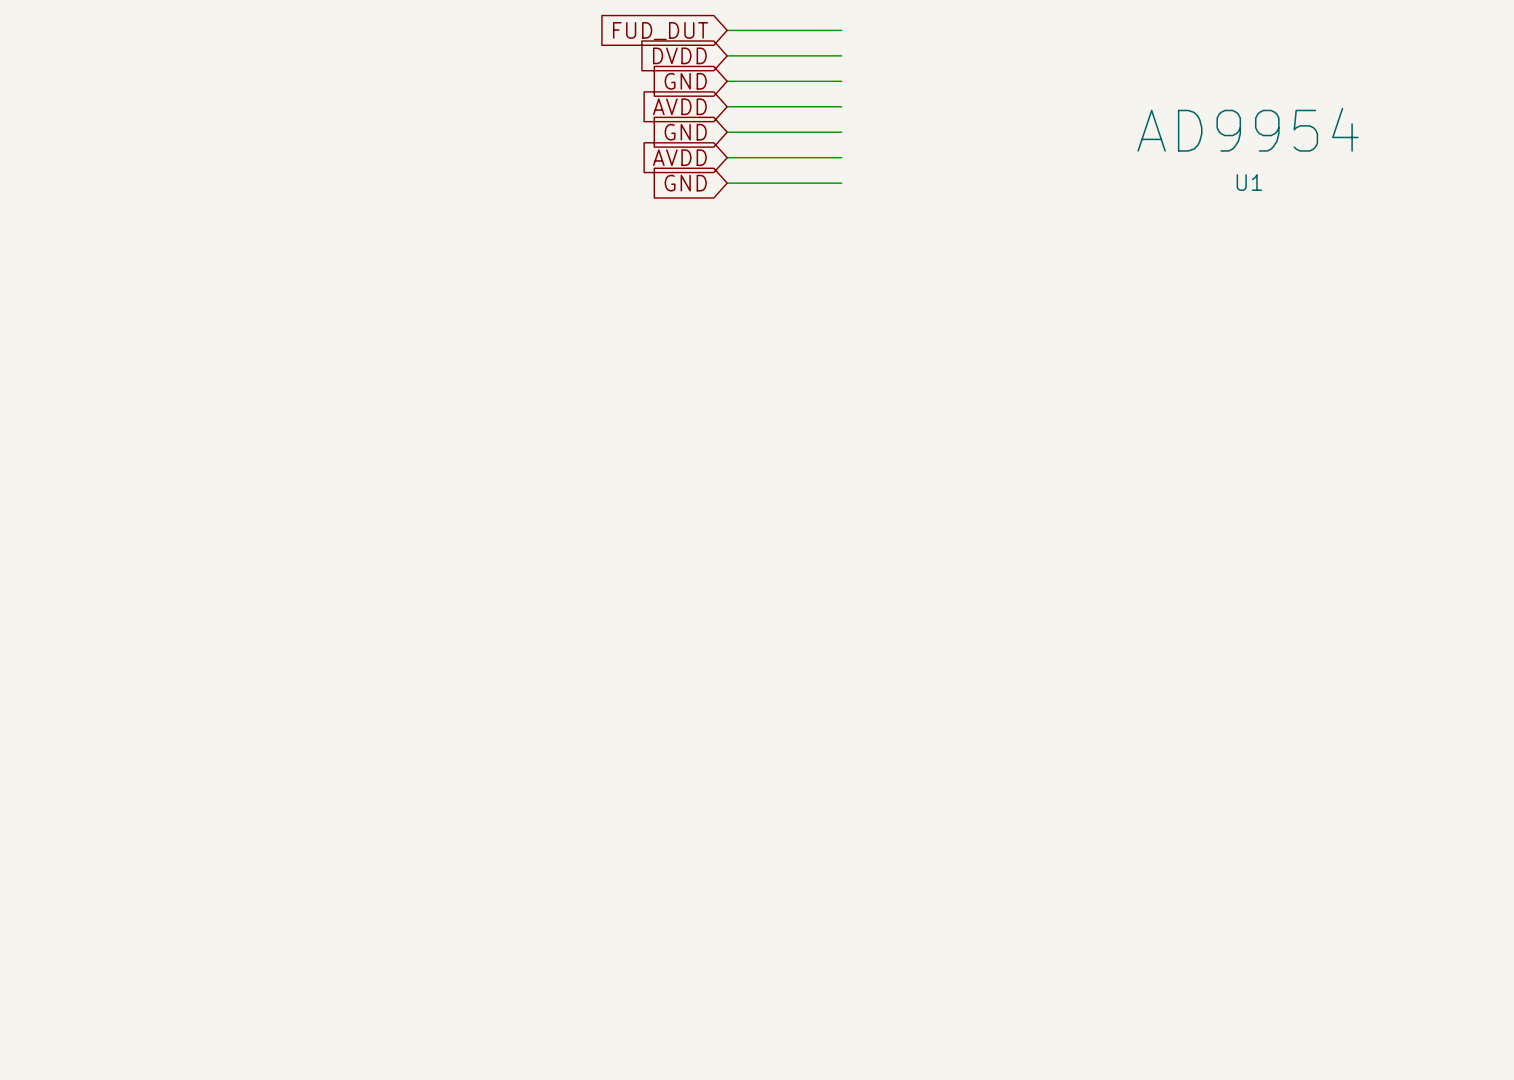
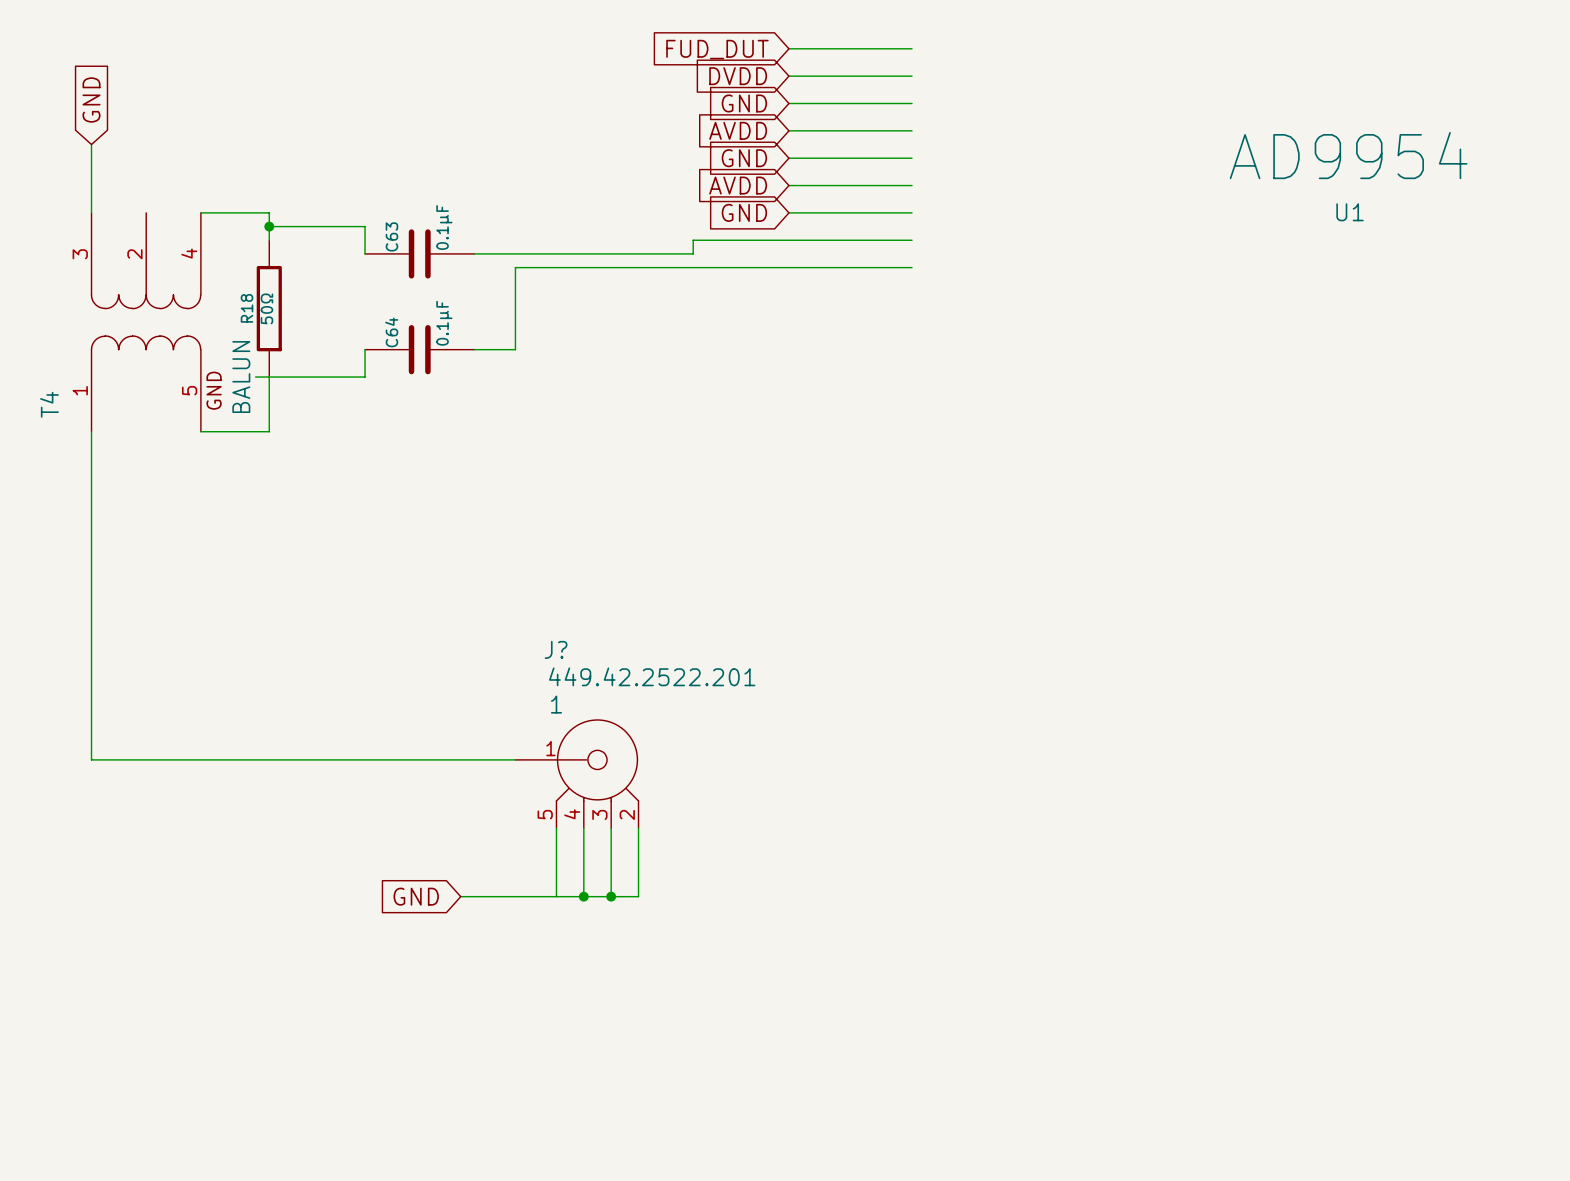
global label: none -> GND (91, 99)
wire: none -> (91, 144) (91, 212)
wire: none -> (200, 212) (269, 212) (269, 240)
wire: none -> (269, 226) (365, 226) (365, 253)
junction: none -> (269, 226)
wire: none -> (912, 240) (693, 240) (693, 253) (474, 253)
C63: none -> 0.1μF (419, 253)
wire: none -> (912, 267) (515, 267) (515, 349) (474, 349)
R18: none -> 50Ω (269, 308)
T4: none -> BALUN (146, 322)
wire: none -> (365, 349) (365, 377) (255, 377)
C64: none -> 0.1μF (419, 349)
wire: none -> (269, 377) (269, 431) (200, 431)
wire: none -> (91, 431) (91, 759) (515, 759)
J?: none -> 449.42.2522.201 (576, 774)
wire: none -> (556, 828) (556, 896)
wire: none -> (583, 828) (583, 896)
wire: none -> (611, 828) (611, 896)
wire: none -> (638, 828) (638, 896) (460, 896)
global label: none -> GND (416, 896)
junction: none -> (583, 896)
junction: none -> (611, 896)

